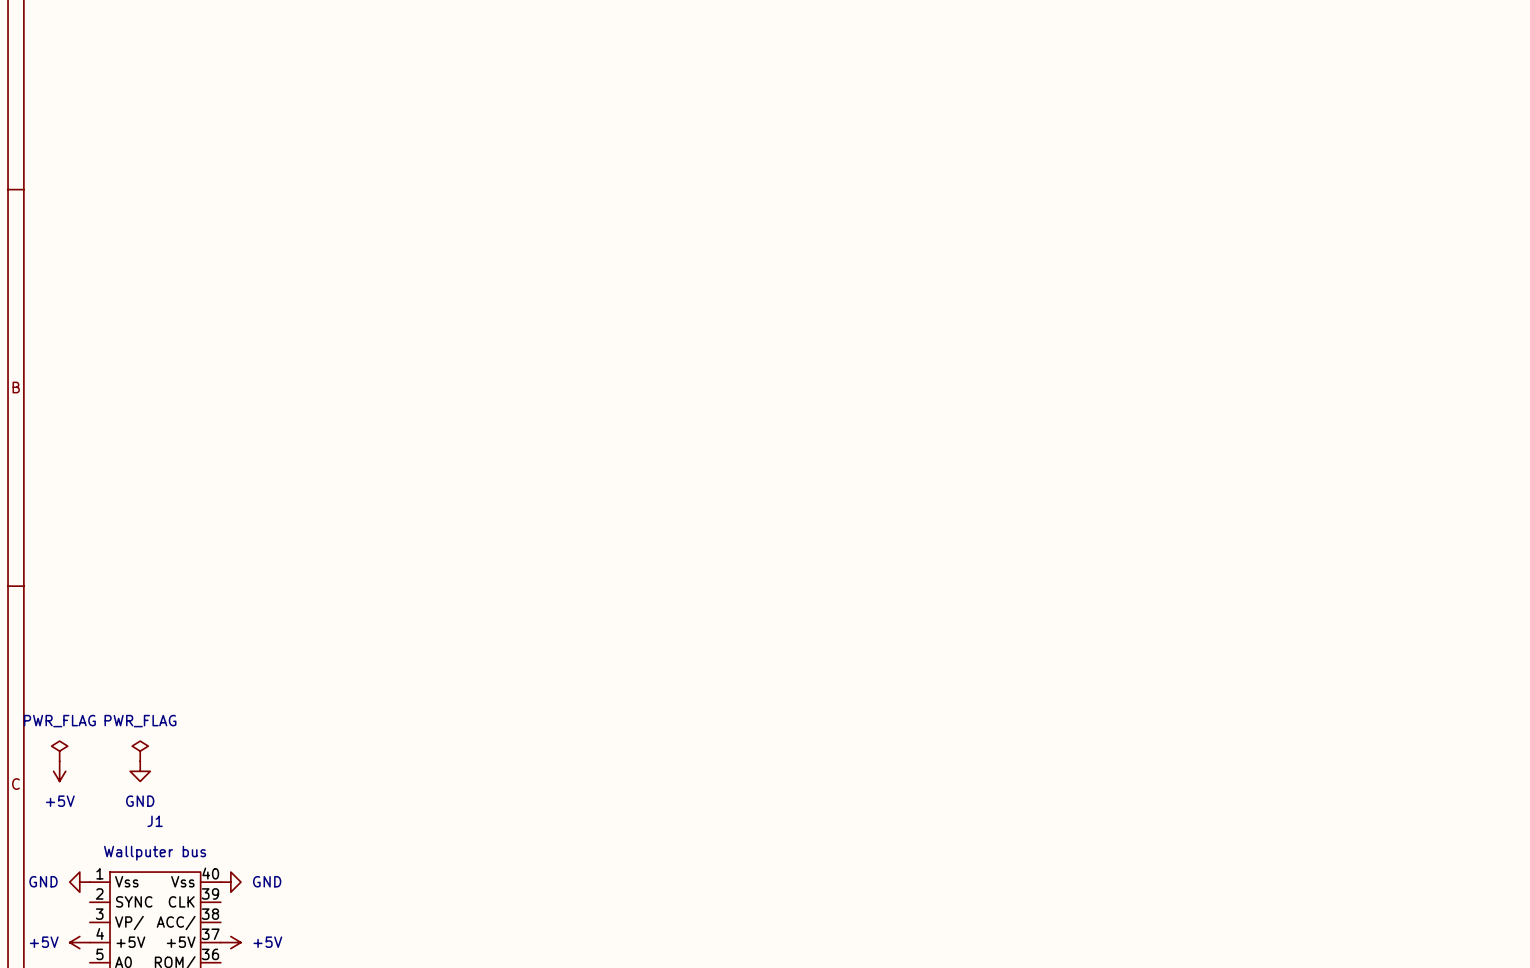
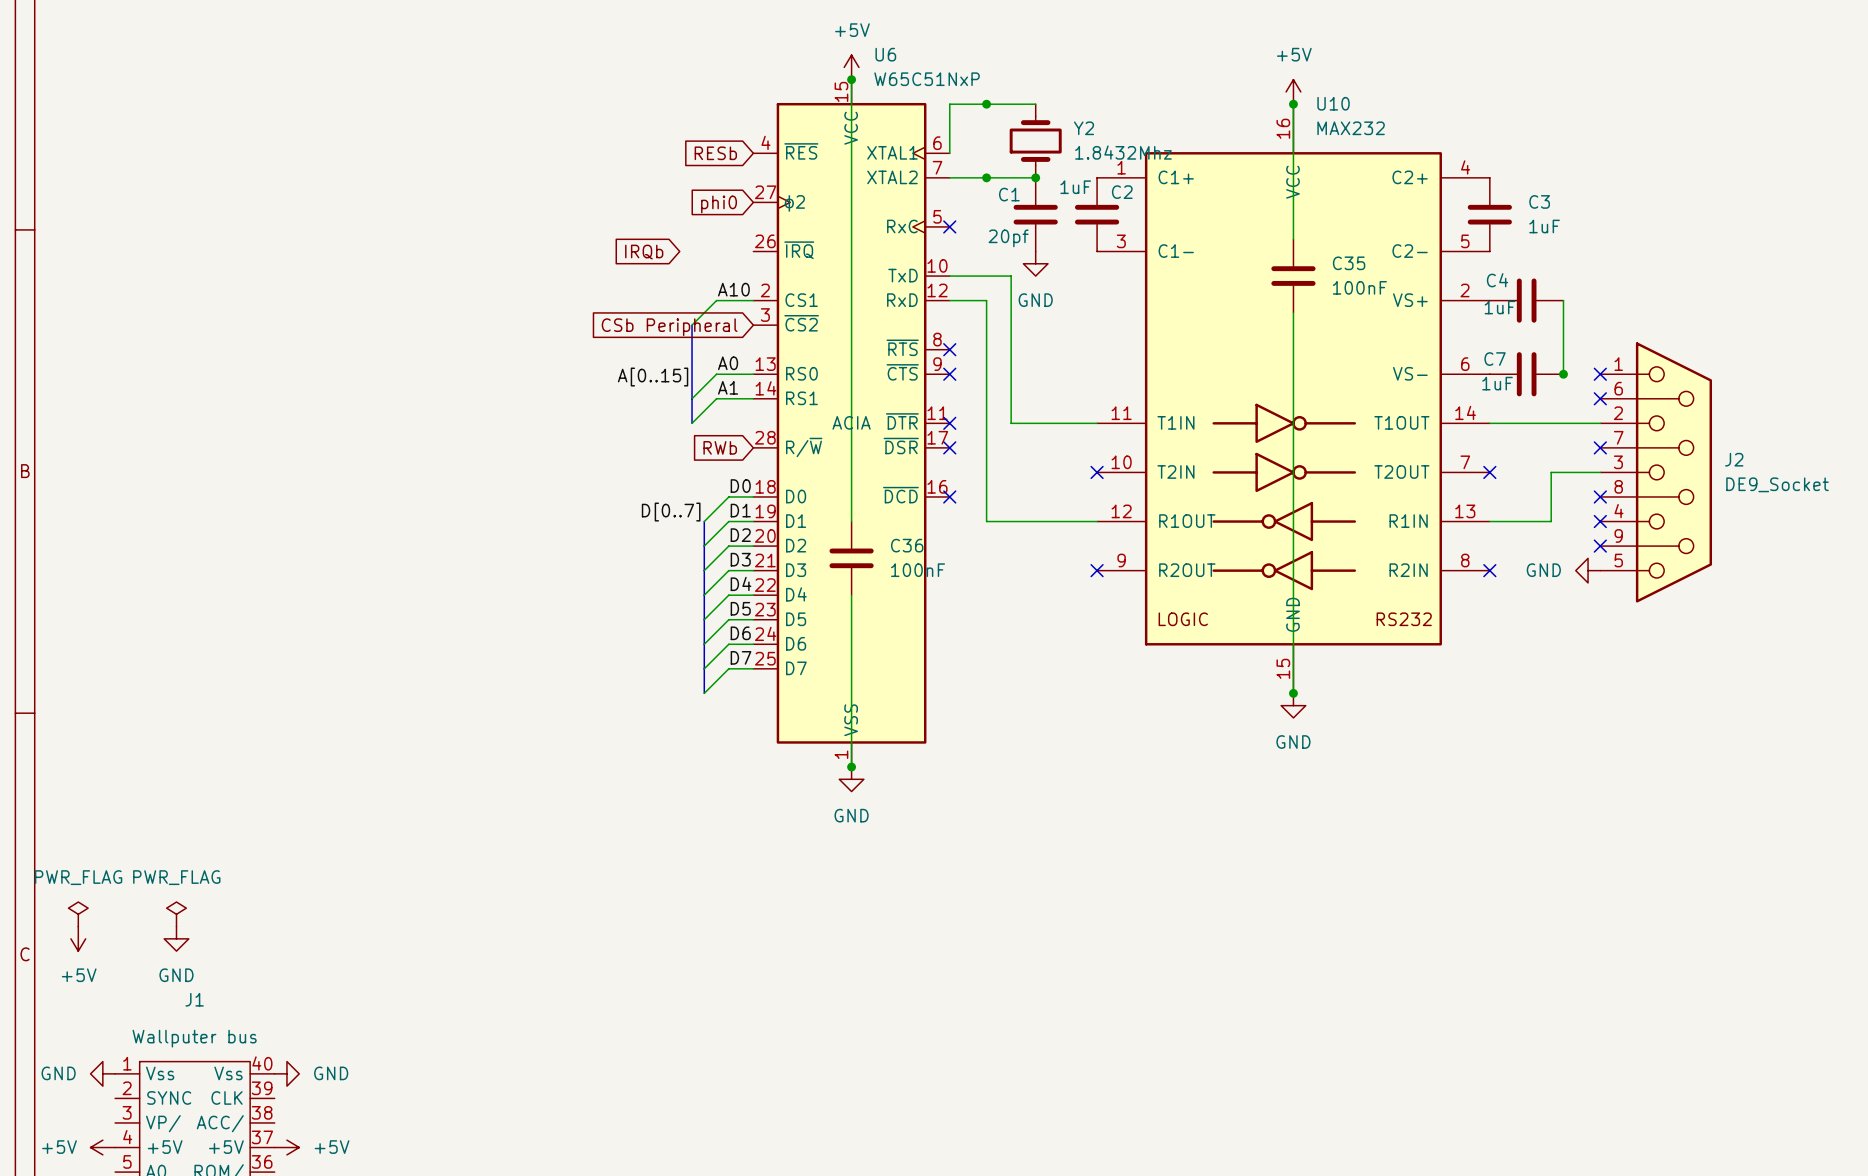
power symbol: none -> +5V (851, 67)
wire: none -> (851, 79) (851, 521)
junction: none -> (851, 79)
power symbol: none -> +5V (1293, 91)
junction: none -> (986, 104)
wire: none -> (1035, 104) (949, 104) (949, 153)
wire: none -> (1293, 104) (1293, 239)
junction: none -> (1293, 104)
Y2: none -> 1.8432Mhz (1035, 141)
global label: none -> RESb (715, 153)
wire: none -> (949, 177) (1035, 177)
junction: none -> (986, 177)
junction: none -> (1035, 177)
global label: none -> phi0 (719, 204)
C1: none -> 20pf (1035, 214)
C2: none -> 1uF (1097, 214)
C3: none -> 1uF (1489, 214)
no-connect mark: none -> (949, 226)
global label: none -> IRQb (644, 252)
power symbol: none -> GND (1035, 263)
wire: none -> (949, 276) (1011, 276) (1011, 423) (1097, 423)
C35: none -> 100nF (1293, 276)
label: none -> A10 (733, 289)
wire: none -> (753, 300) (716, 300) (692, 325)
wire: none -> (949, 300) (986, 300) (986, 521) (1097, 521)
C4: none -> 1uF (1526, 300)
wire: none -> (1563, 300) (1563, 374)
wire: none -> (1293, 312) (1293, 693)
bus: none -> (692, 325) (692, 423)
global label: none -> CSb Peripheral (669, 327)
no-connect mark: none -> (949, 349)
label: none -> A0 (728, 363)
wire: none -> (753, 374) (716, 374) (692, 398)
no-connect mark: none -> (949, 374)
C7: none -> 1uF (1526, 374)
junction: none -> (1563, 374)
no-connect mark: none -> (1600, 374)
label: none -> A[0..15] (653, 377)
label: none -> A1 (728, 387)
wire: none -> (753, 398) (716, 398) (692, 423)
U10: none -> MAX232 (1293, 398)
no-connect mark: none -> (1600, 398)
U6: none -> W65C51NxP (851, 423)
no-connect mark: none -> (949, 423)
wire: none -> (1489, 423) (1600, 423)
global label: none -> RWb (720, 447)
no-connect mark: none -> (949, 447)
no-connect mark: none -> (1600, 447)
no-connect mark: none -> (1097, 472)
no-connect mark: none -> (1489, 472)
wire: none -> (1600, 472) (1551, 472) (1551, 521) (1489, 521)
J2: none -> DE9_Socket (1656, 472)
label: none -> D0 (740, 486)
wire: none -> (753, 496) (728, 496) (704, 521)
no-connect mark: none -> (949, 496)
no-connect mark: none -> (1600, 496)
label: none -> D1 (740, 510)
label: none -> D[0..7] (671, 512)
bus: none -> (704, 521) (704, 693)
wire: none -> (753, 521) (728, 521) (704, 546)
no-connect mark: none -> (1600, 521)
label: none -> D2 (740, 535)
wire: none -> (753, 546) (728, 546) (704, 570)
no-connect mark: none -> (1600, 546)
C36: none -> 100nF (851, 558)
label: none -> D3 (740, 559)
wire: none -> (753, 570) (728, 570) (704, 595)
no-connect mark: none -> (1097, 570)
no-connect mark: none -> (1489, 570)
power symbol: none -> GND (1588, 570)
label: none -> D4 (741, 583)
wire: none -> (753, 595) (728, 595) (704, 619)
wire: none -> (851, 595) (851, 767)
label: none -> D5 (740, 608)
wire: none -> (753, 619) (728, 619) (704, 644)
label: none -> D6 (740, 633)
wire: none -> (753, 644) (728, 644) (704, 668)
label: none -> D7 (741, 657)
wire: none -> (753, 668) (728, 668) (704, 693)
junction: none -> (1293, 693)
power symbol: none -> GND (1293, 705)
junction: none -> (851, 767)
power symbol: none -> GND (851, 779)

